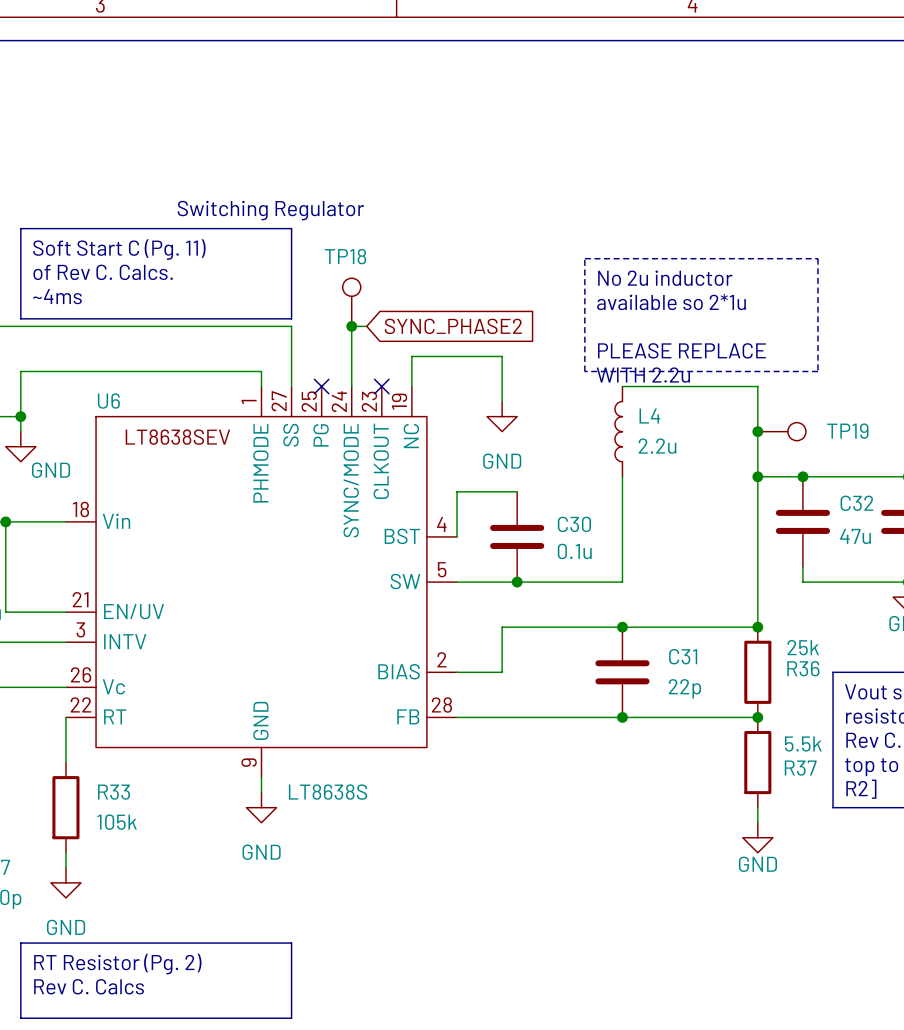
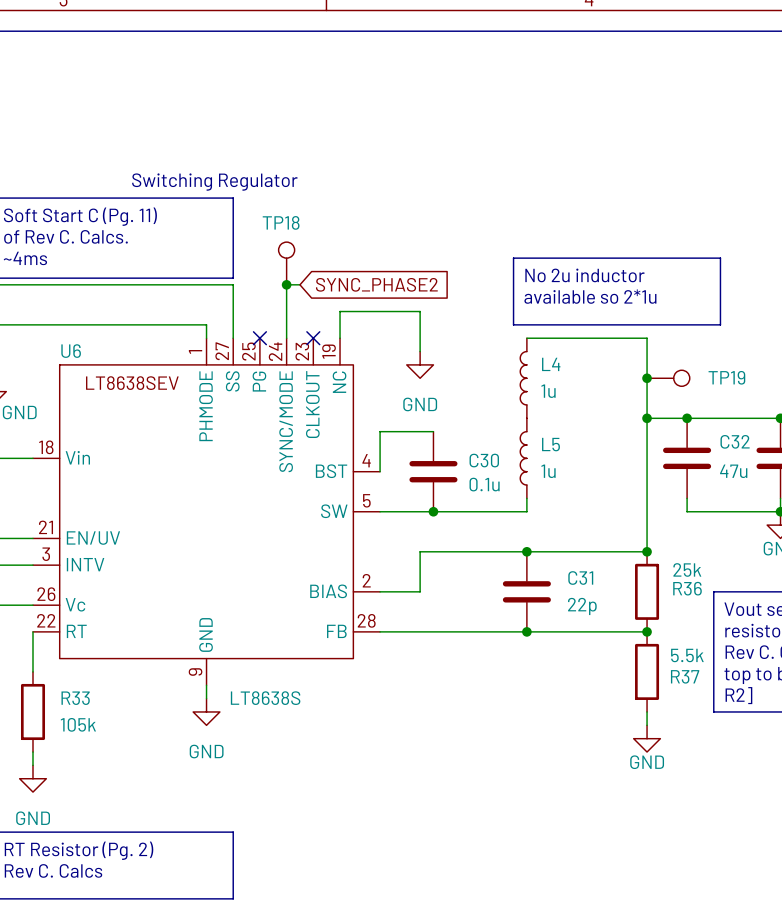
line: (584, 258) (817, 258) (817, 371) (584, 371) (584, 258) -> (513, 258) (513, 324) (720, 324) (720, 258) (513, 258)
text position: No 2u inductor (665, 278) -> No 2u inductor (584, 275)
text position: available so 2*1u (671, 302) -> available so 2*1u (590, 296)
text: PLEASE REPLACE (681, 350) -> none
text: WITH 2.2u (643, 375) -> none
L4 value: 2.2u (657, 446) -> 1u (548, 391)
wire: (622, 476) (622, 567) -> none
L5: none -> 1u (523, 458)

